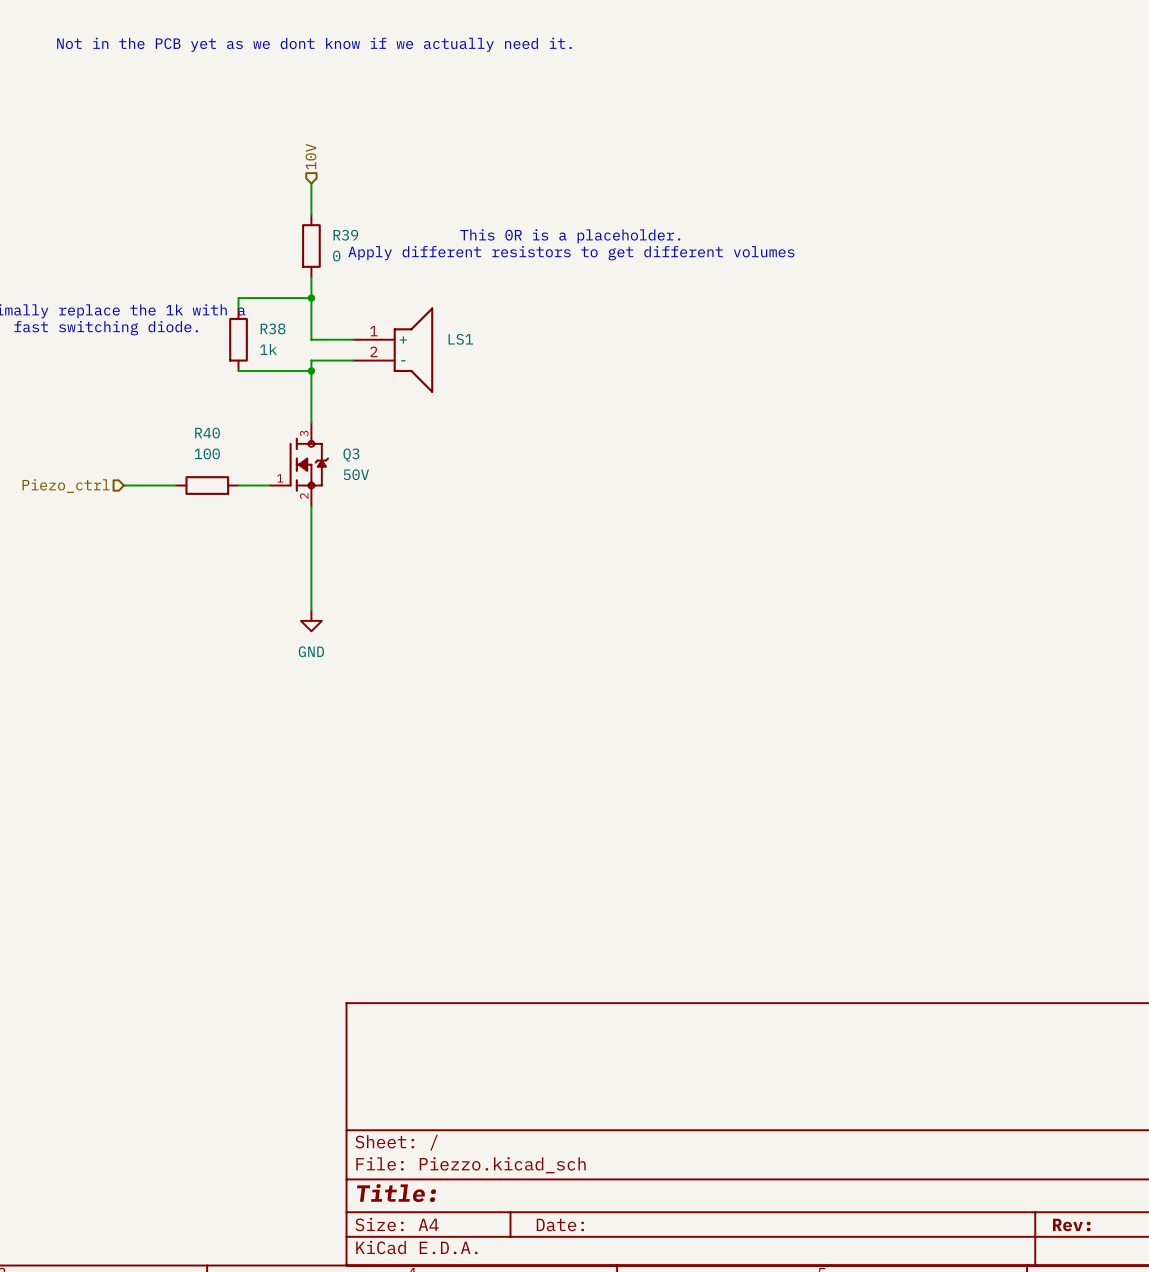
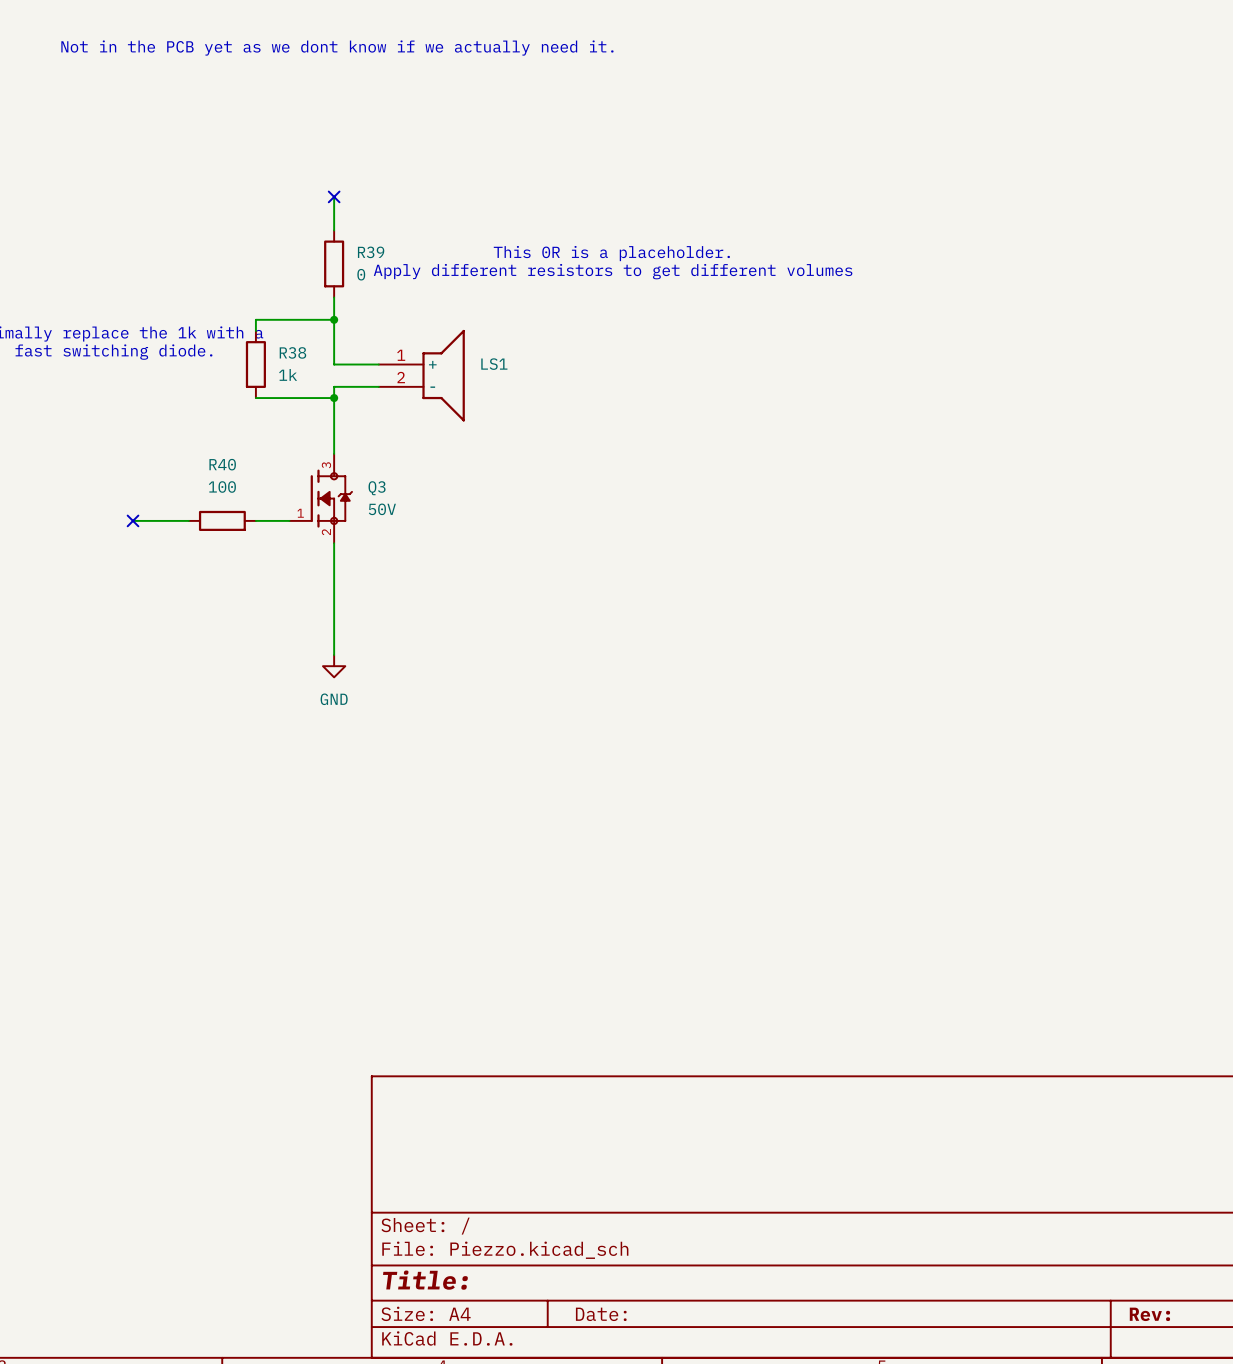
hierarchical label: 10V (311, 156) -> none
no-connect mark: none -> (334, 196)
no-connect mark: none -> (133, 520)
hierarchical label: Piezo_ctrl (66, 486) -> none

